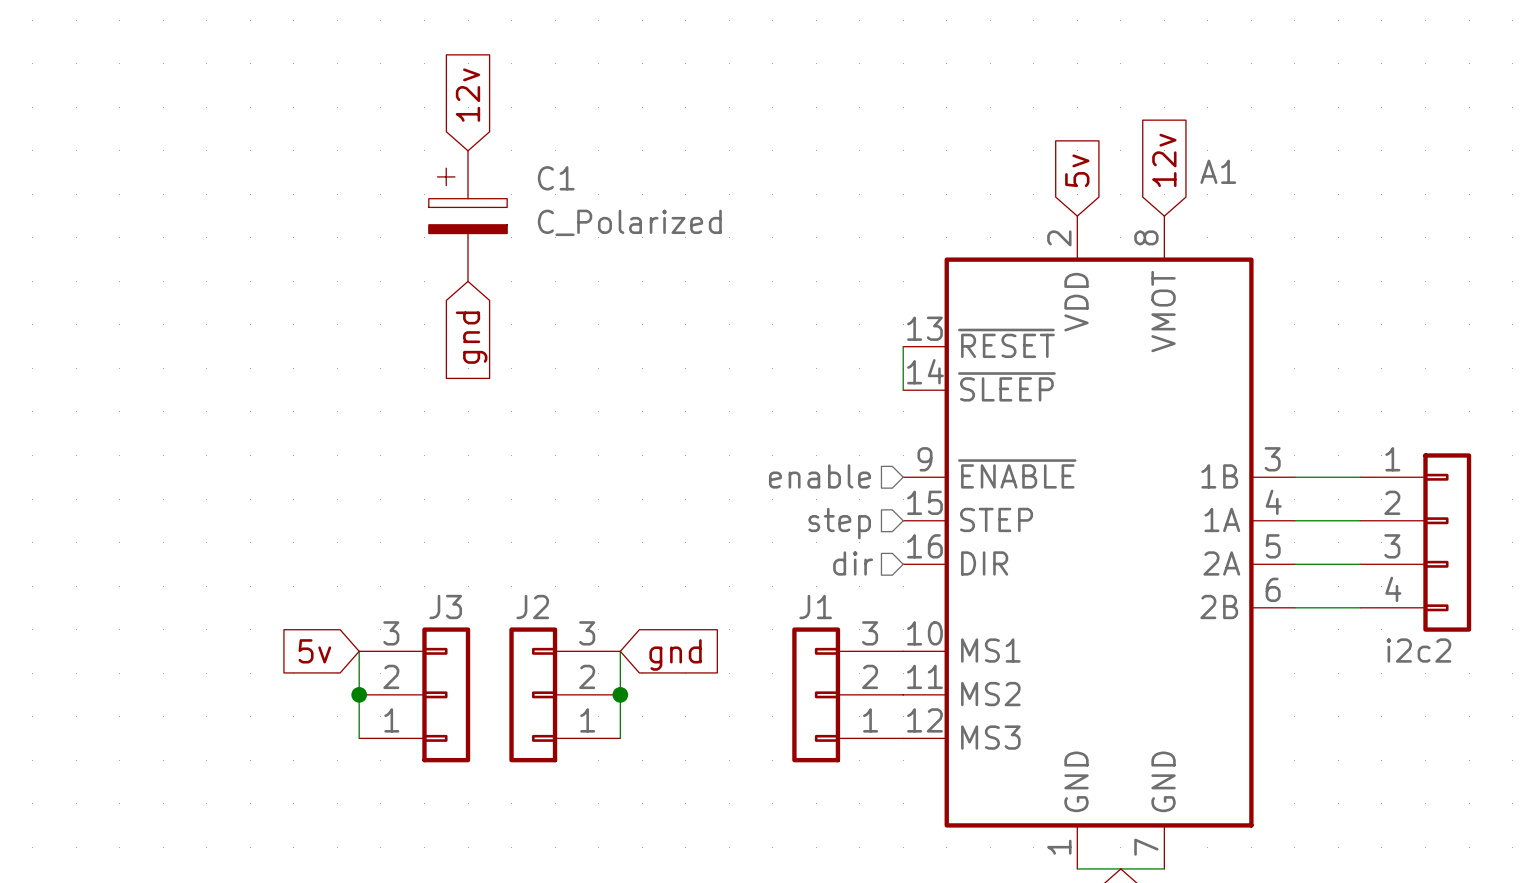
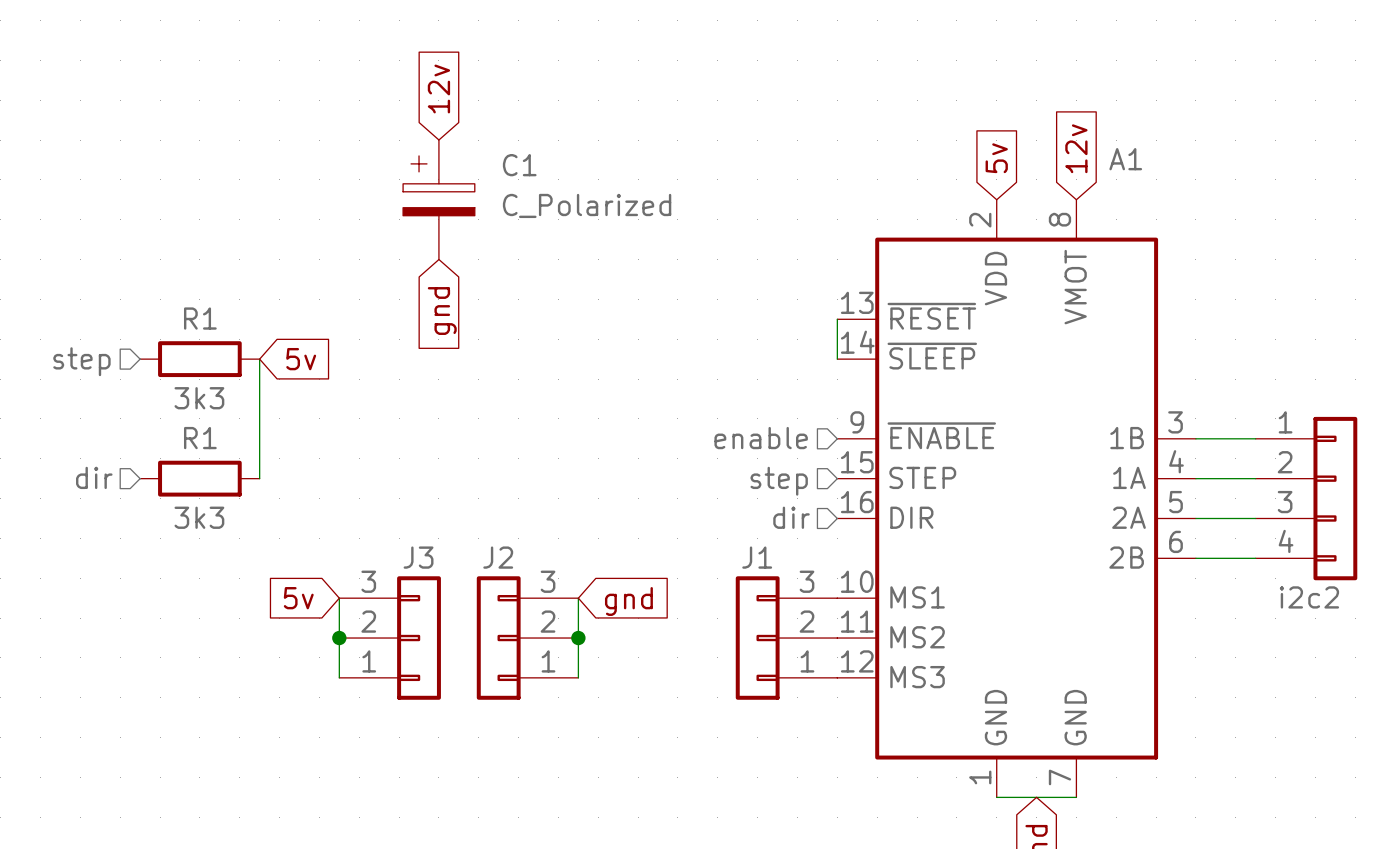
R1: none -> 3k3 (199, 359)
wire: none -> (259, 359) (259, 478)
global label: none -> 5v (301, 359)
hierarchical label: none -> step (81, 361)
hierarchical label: none -> dir (94, 477)
R1: none -> 3k3 (199, 478)

